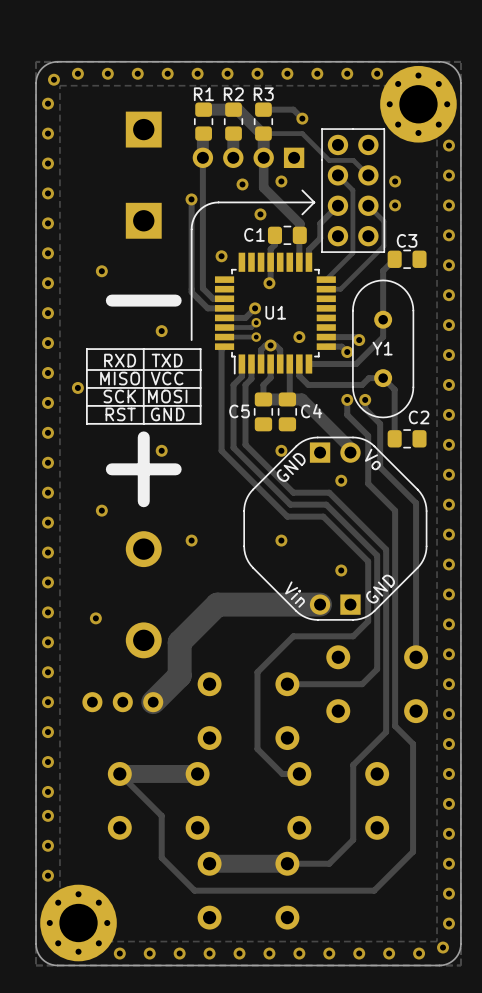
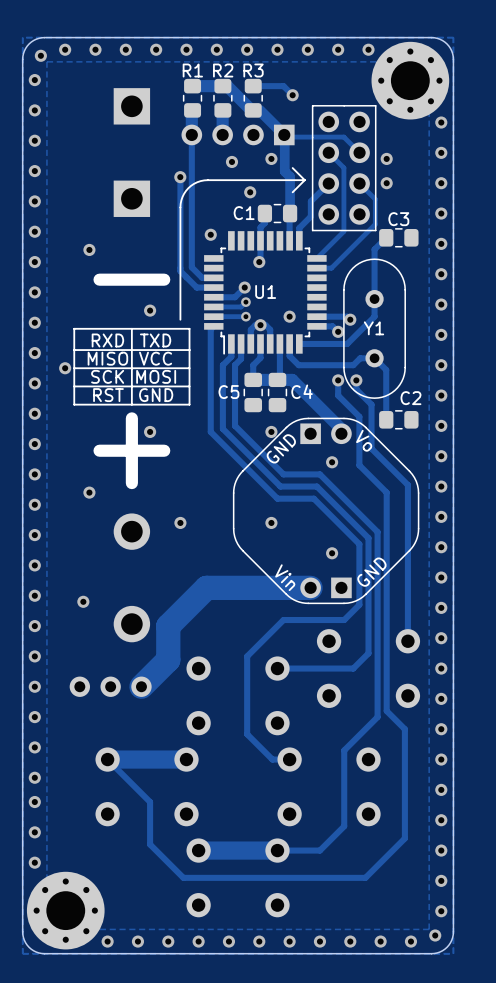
track: (263, 133) (263, 187) (299, 223) -> (344, 137) (286, 137) (259, 110) (284, 134) (284, 135) (284, 171) (290, 176) (290, 201)
track: (269, 133) (302, 133) (329, 160) (353, 160) -> none

